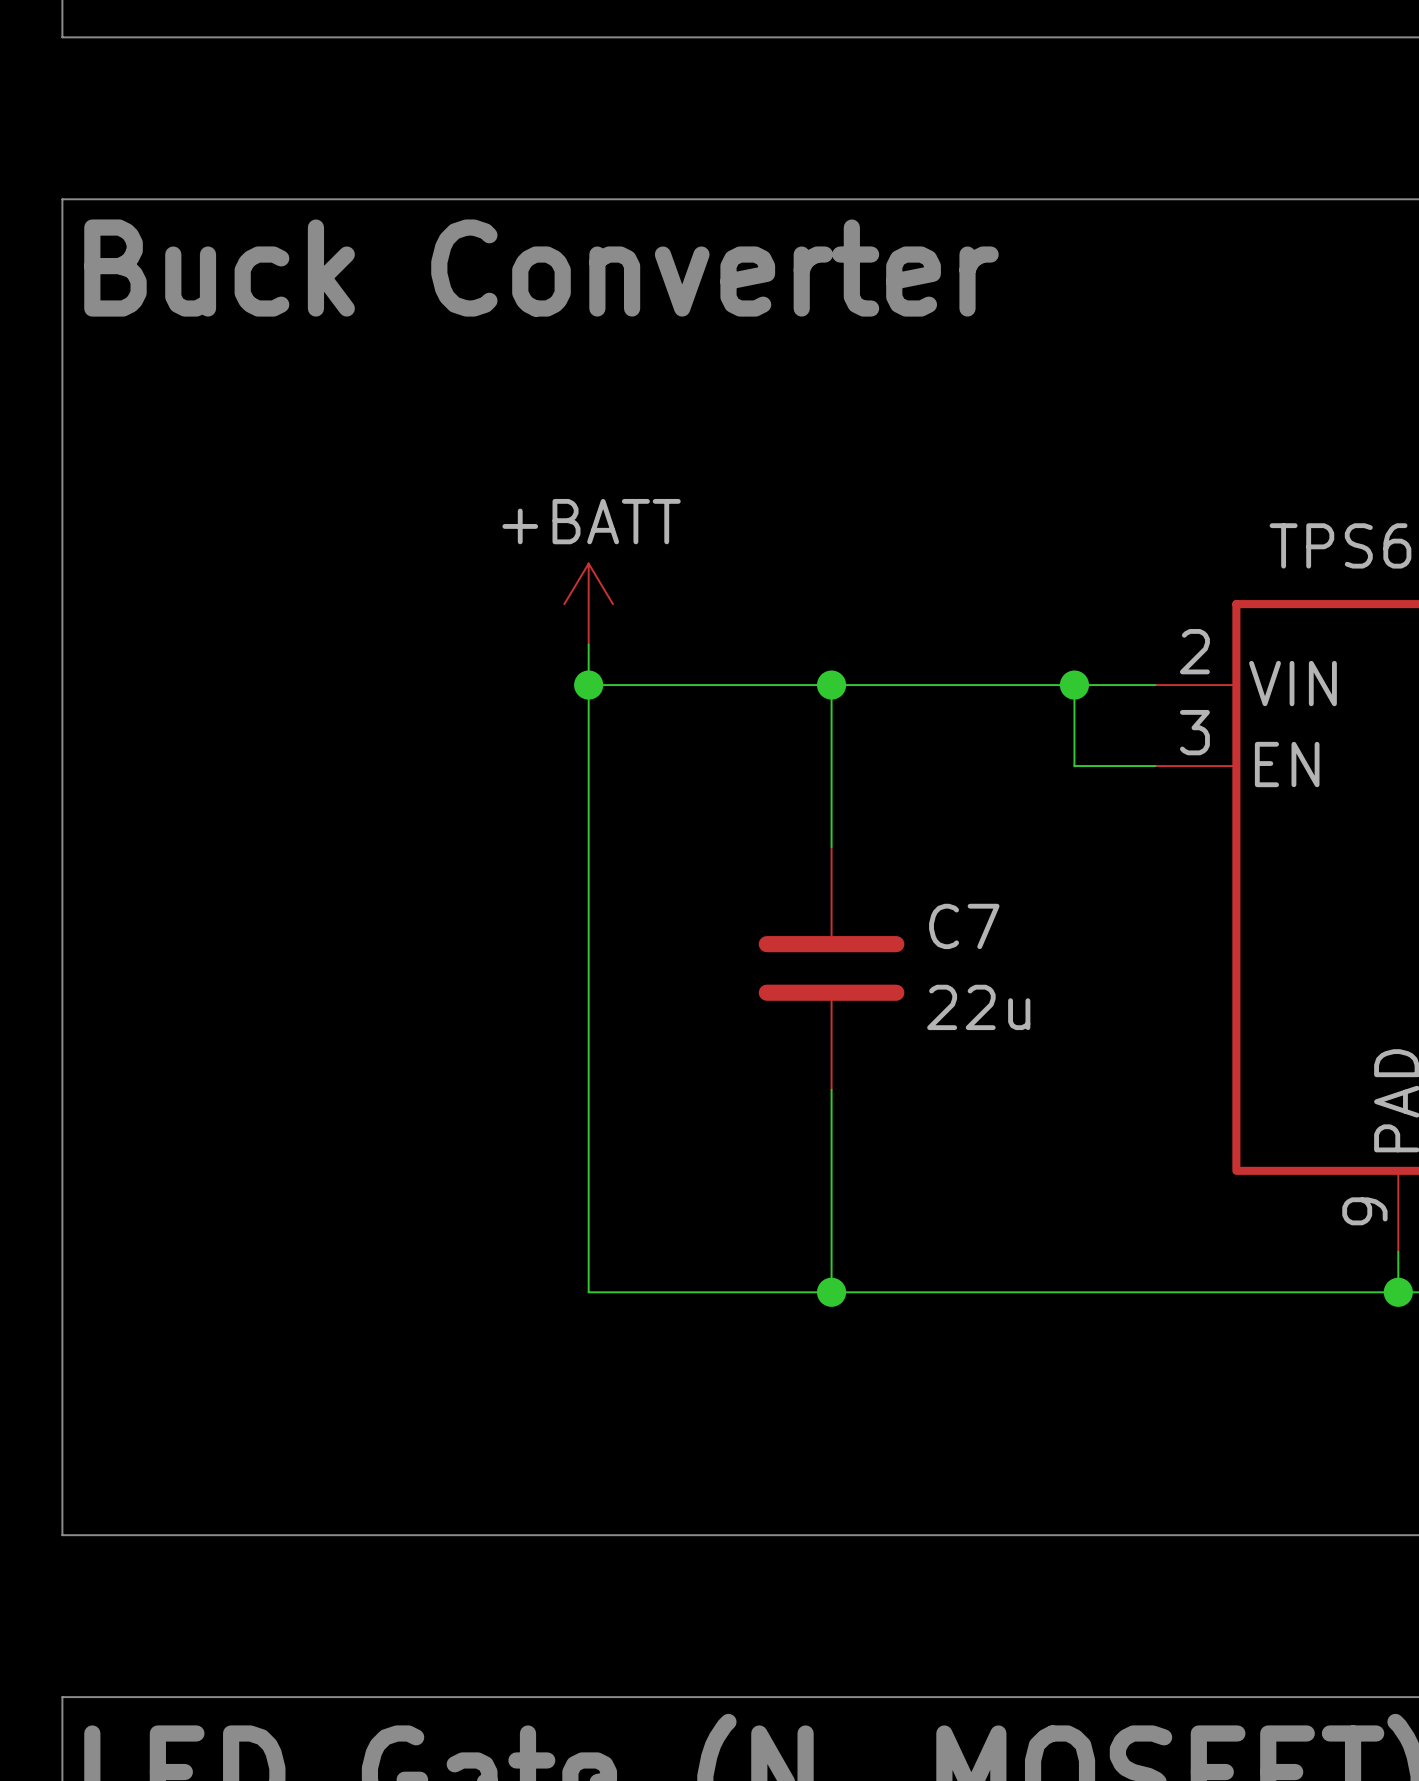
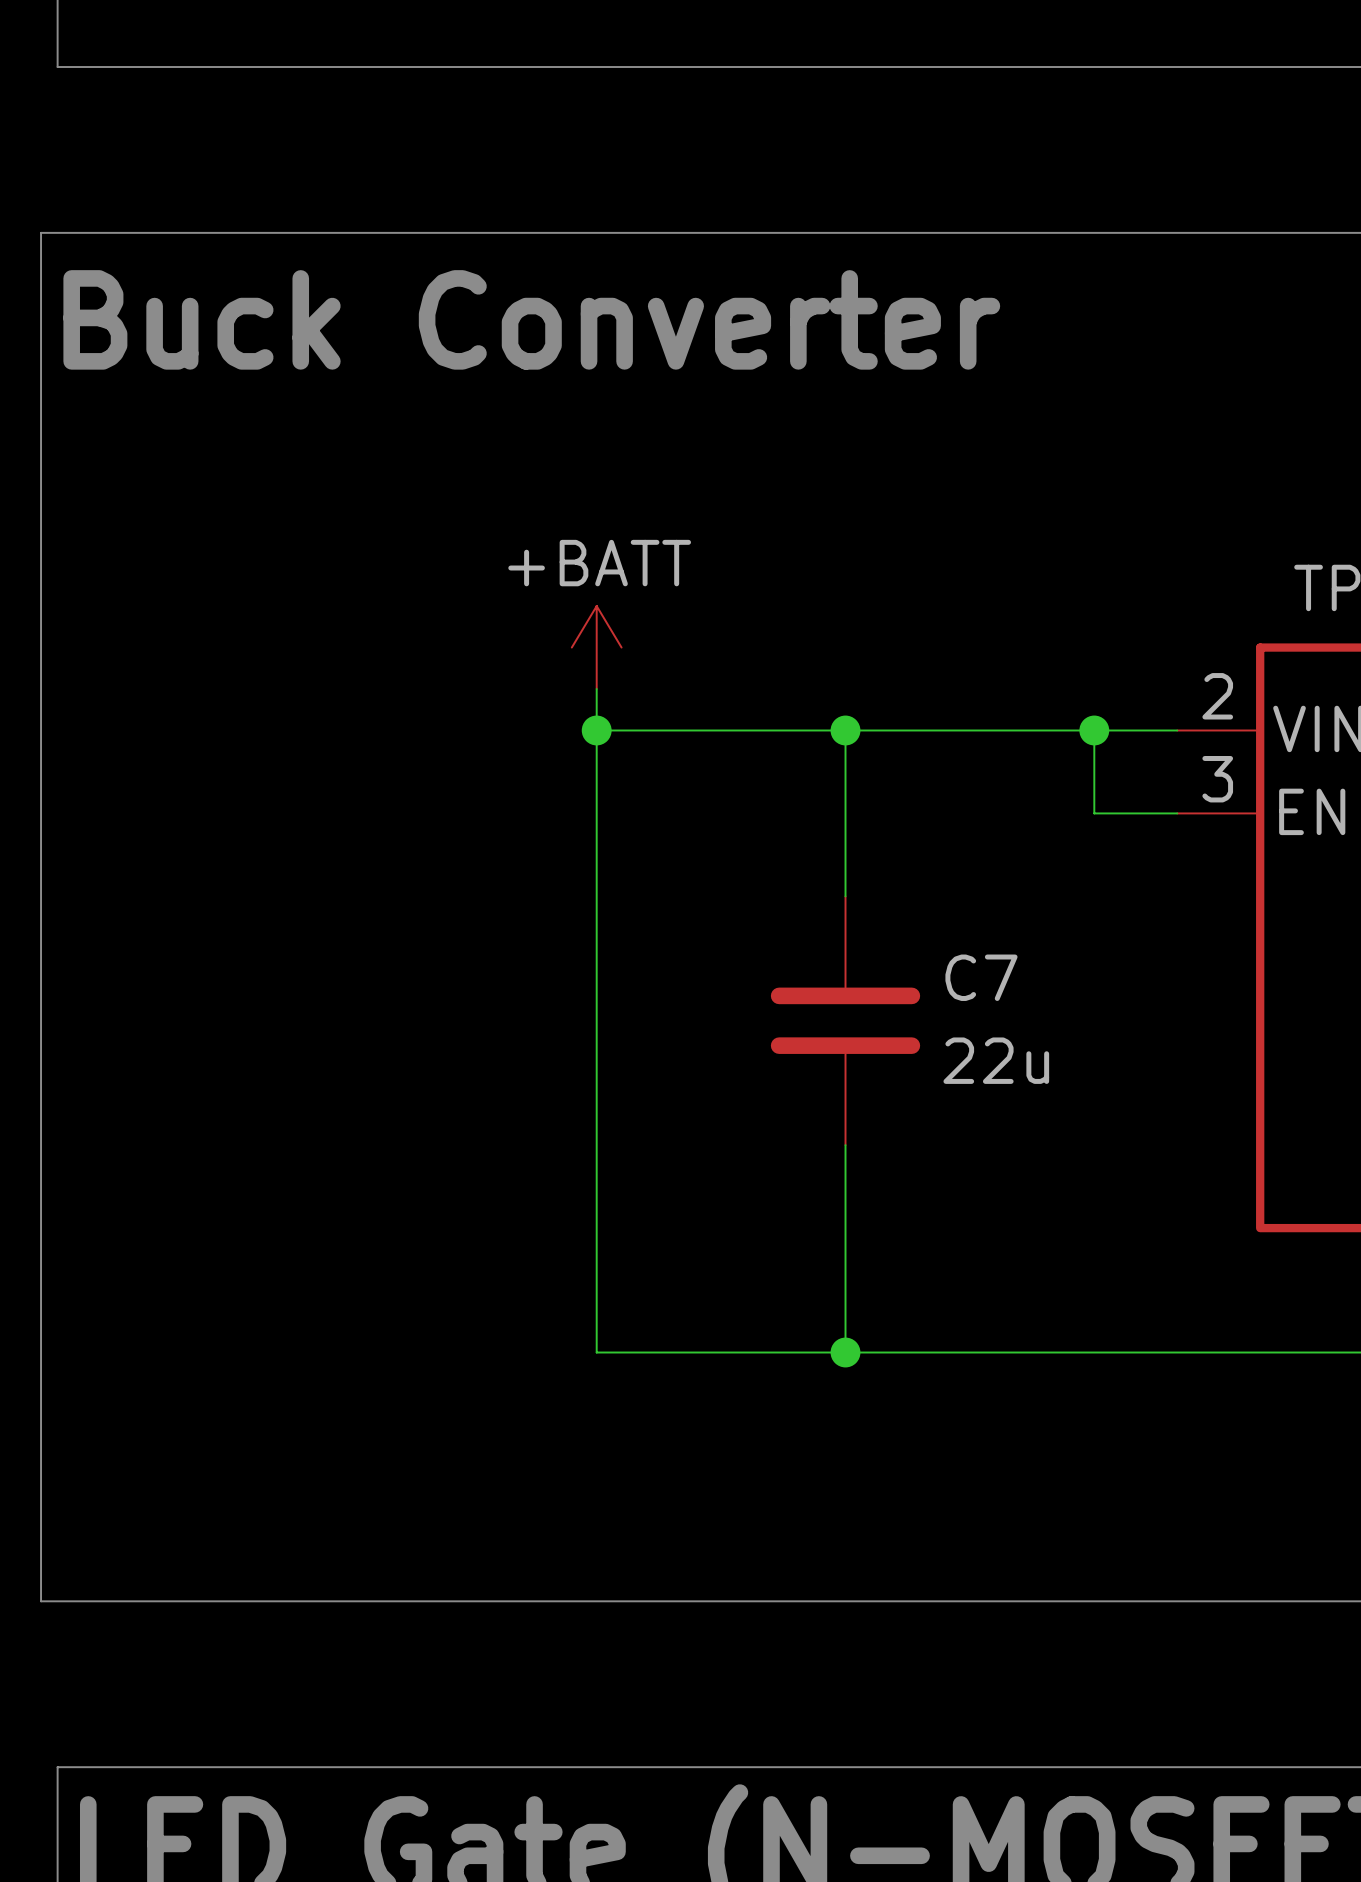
line: (62, 199) (62, 1535) -> (57, 232) (41, 232) (41, 1601) (57, 1601)
text position: Buck Converter (541, 268) -> Buck Converter (531, 319)

